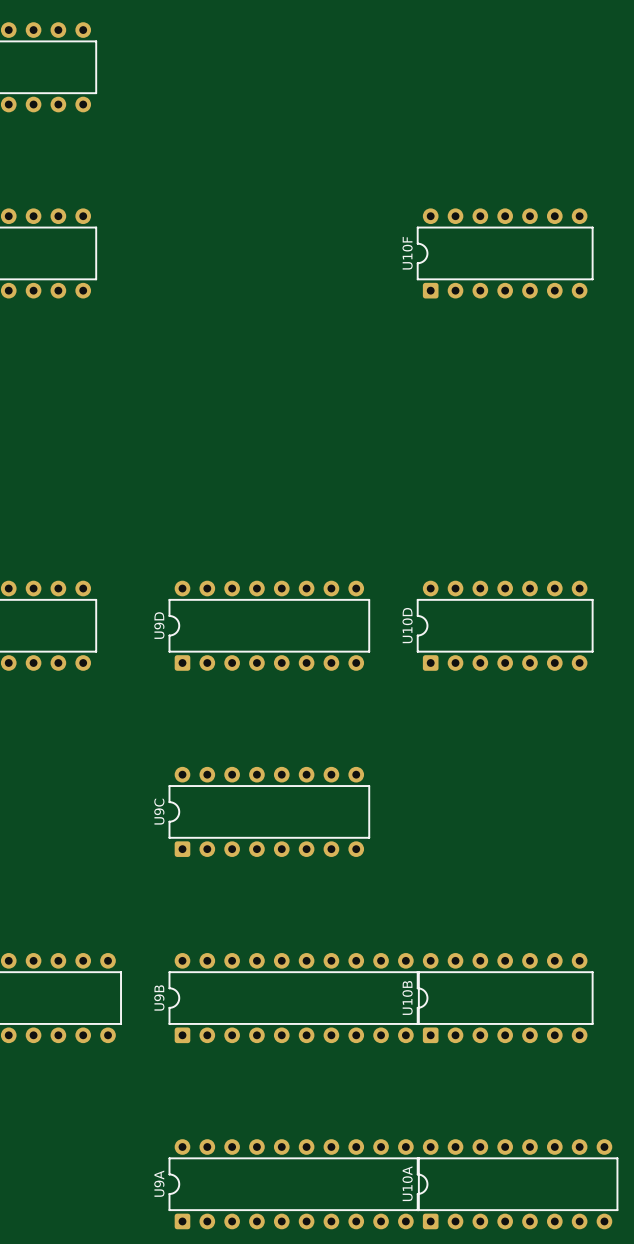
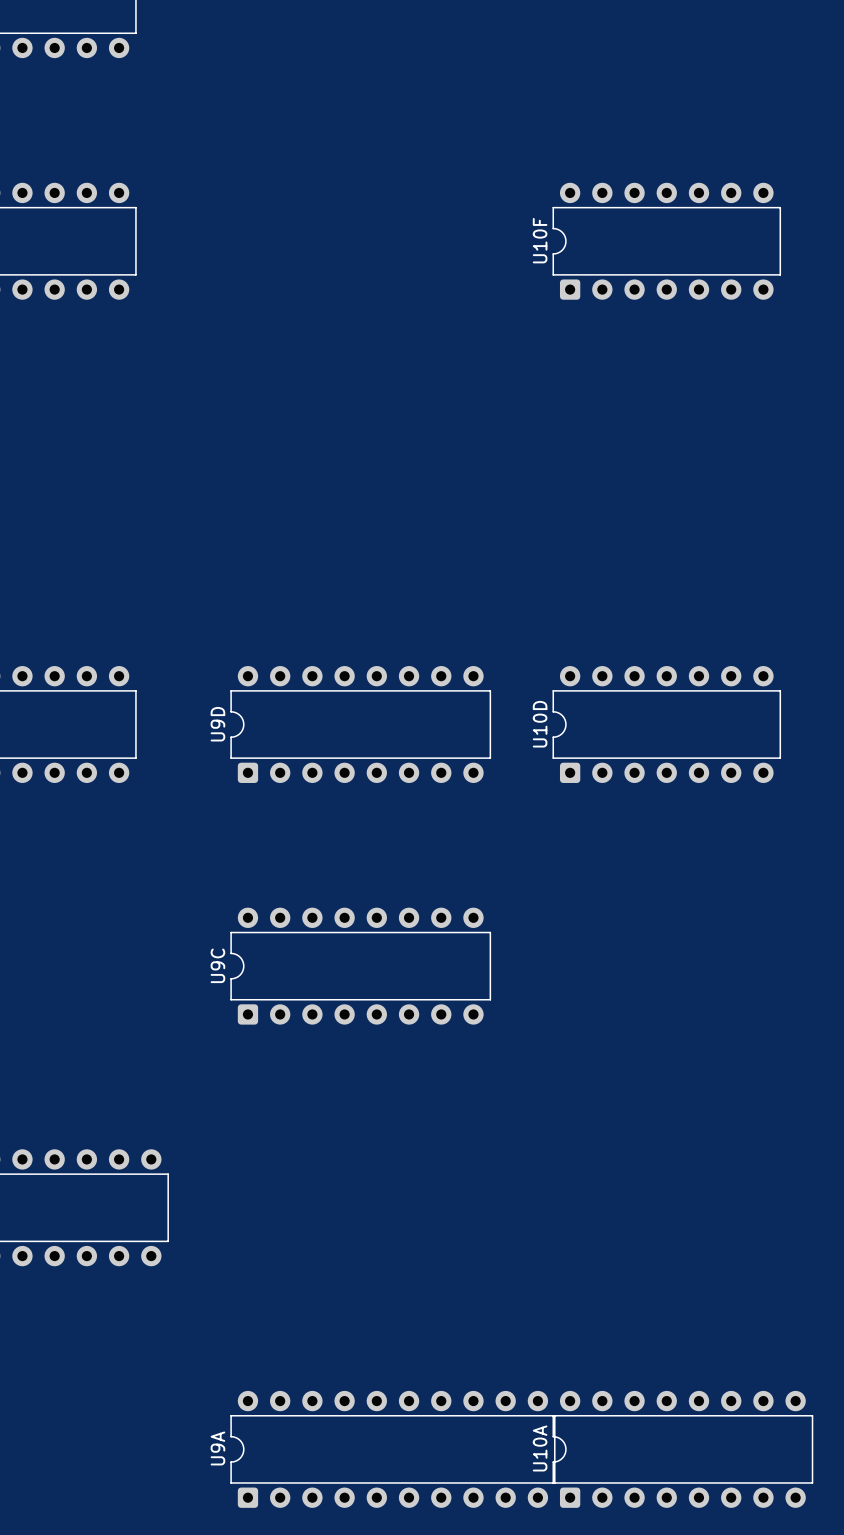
U9B: (294, 998) -> none
U10B: (505, 998) -> none

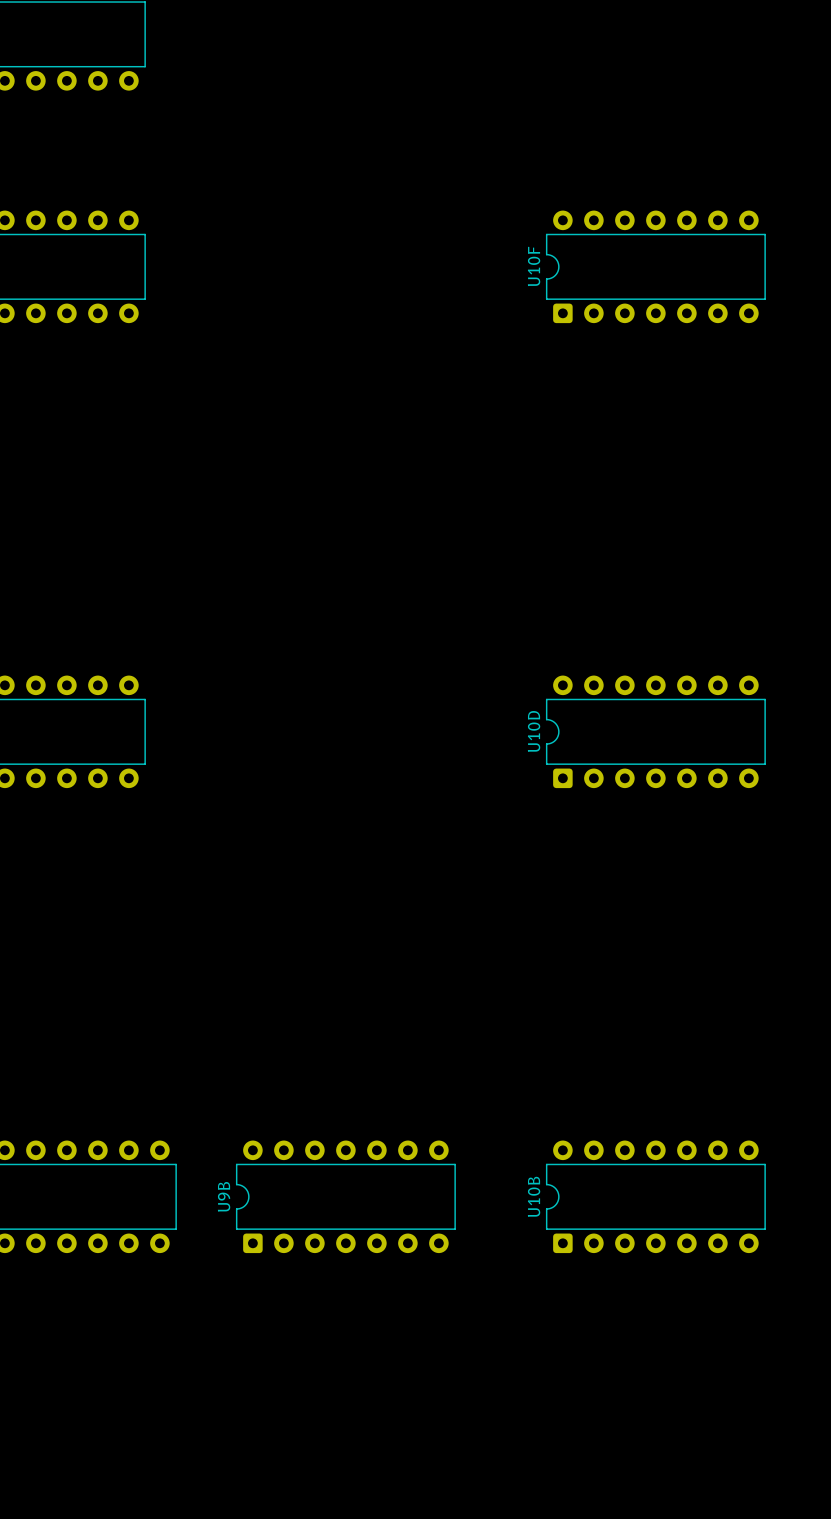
U9D: (360, 724) -> none
U9C: (360, 966) -> none
U9B: none -> (345, 1196)
U10B: none -> (655, 1196)
U9A: (392, 1449) -> none
U10A: (682, 1449) -> none

